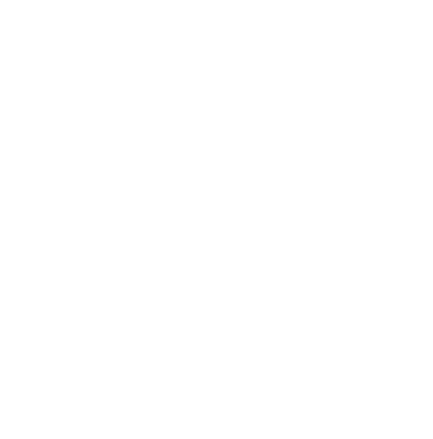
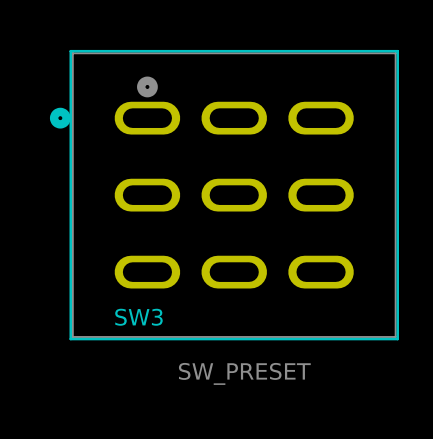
SW3: none -> SW_PRESET (224, 195)

